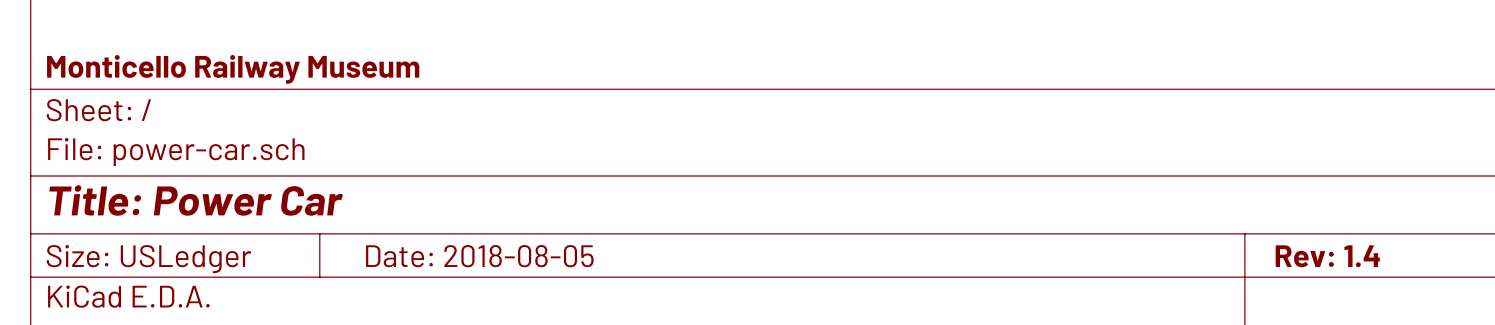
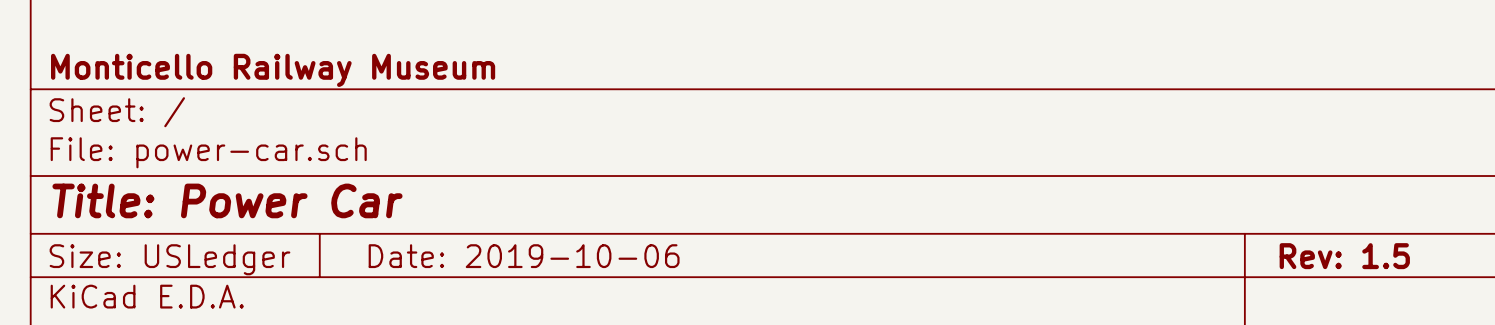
title block: Date: 2018-08-05 (479, 256) -> Date: 2019-10-06 (524, 256)
title block: Rev: 1.4 (1327, 256) -> Rev: 1.5 (1344, 256)

